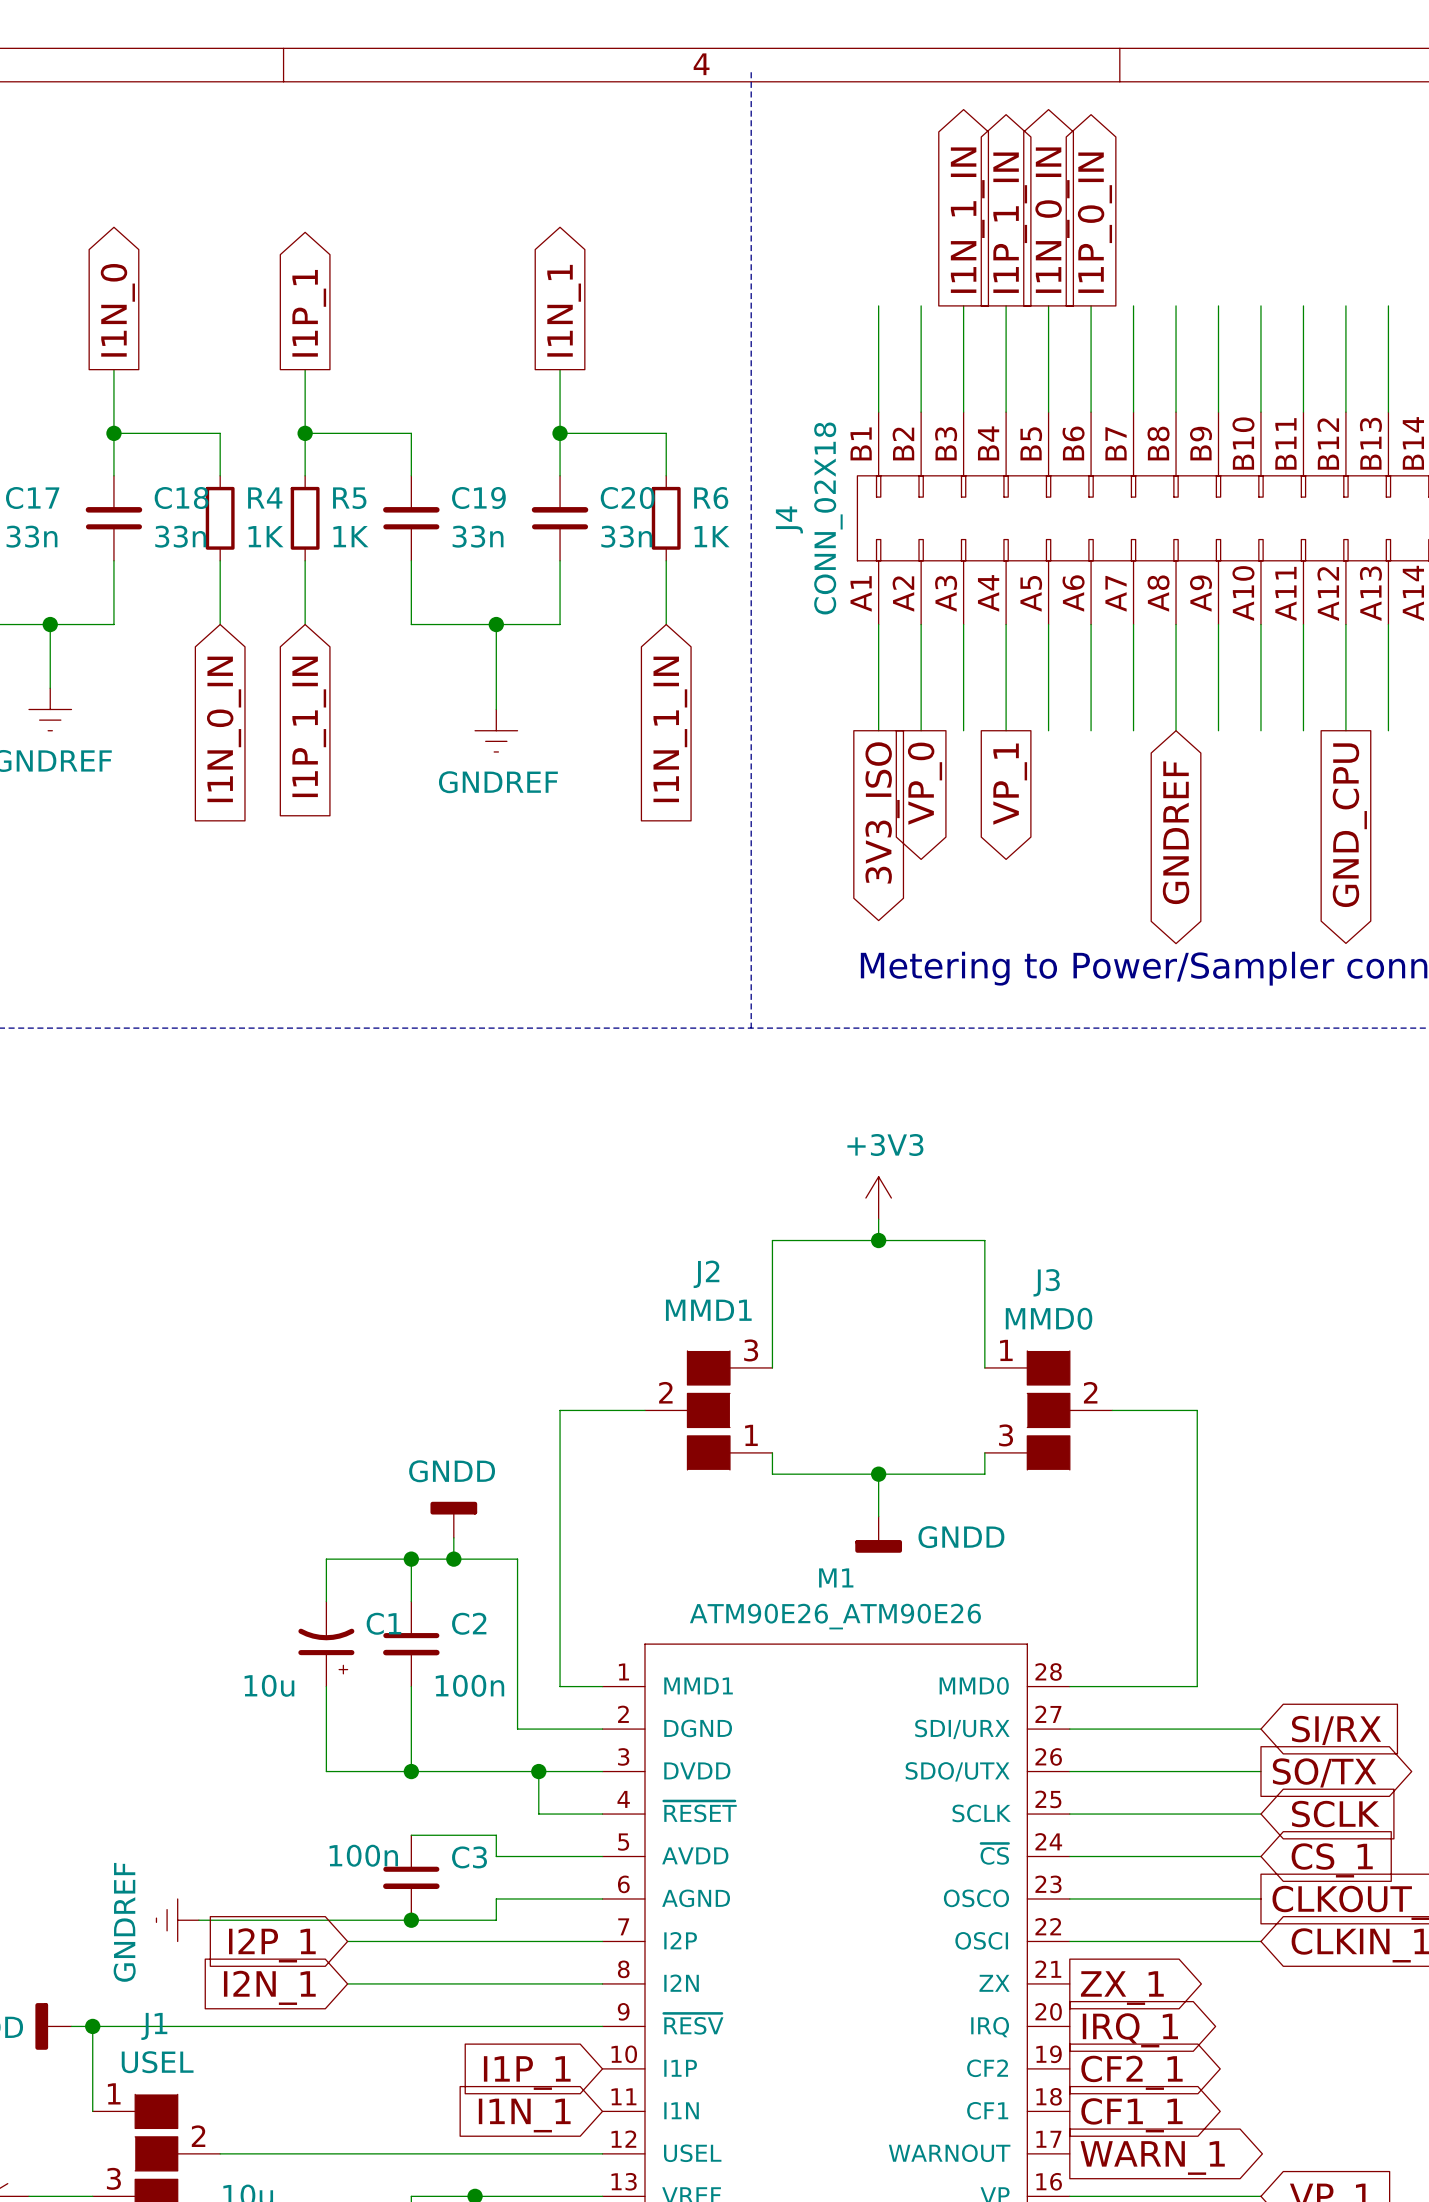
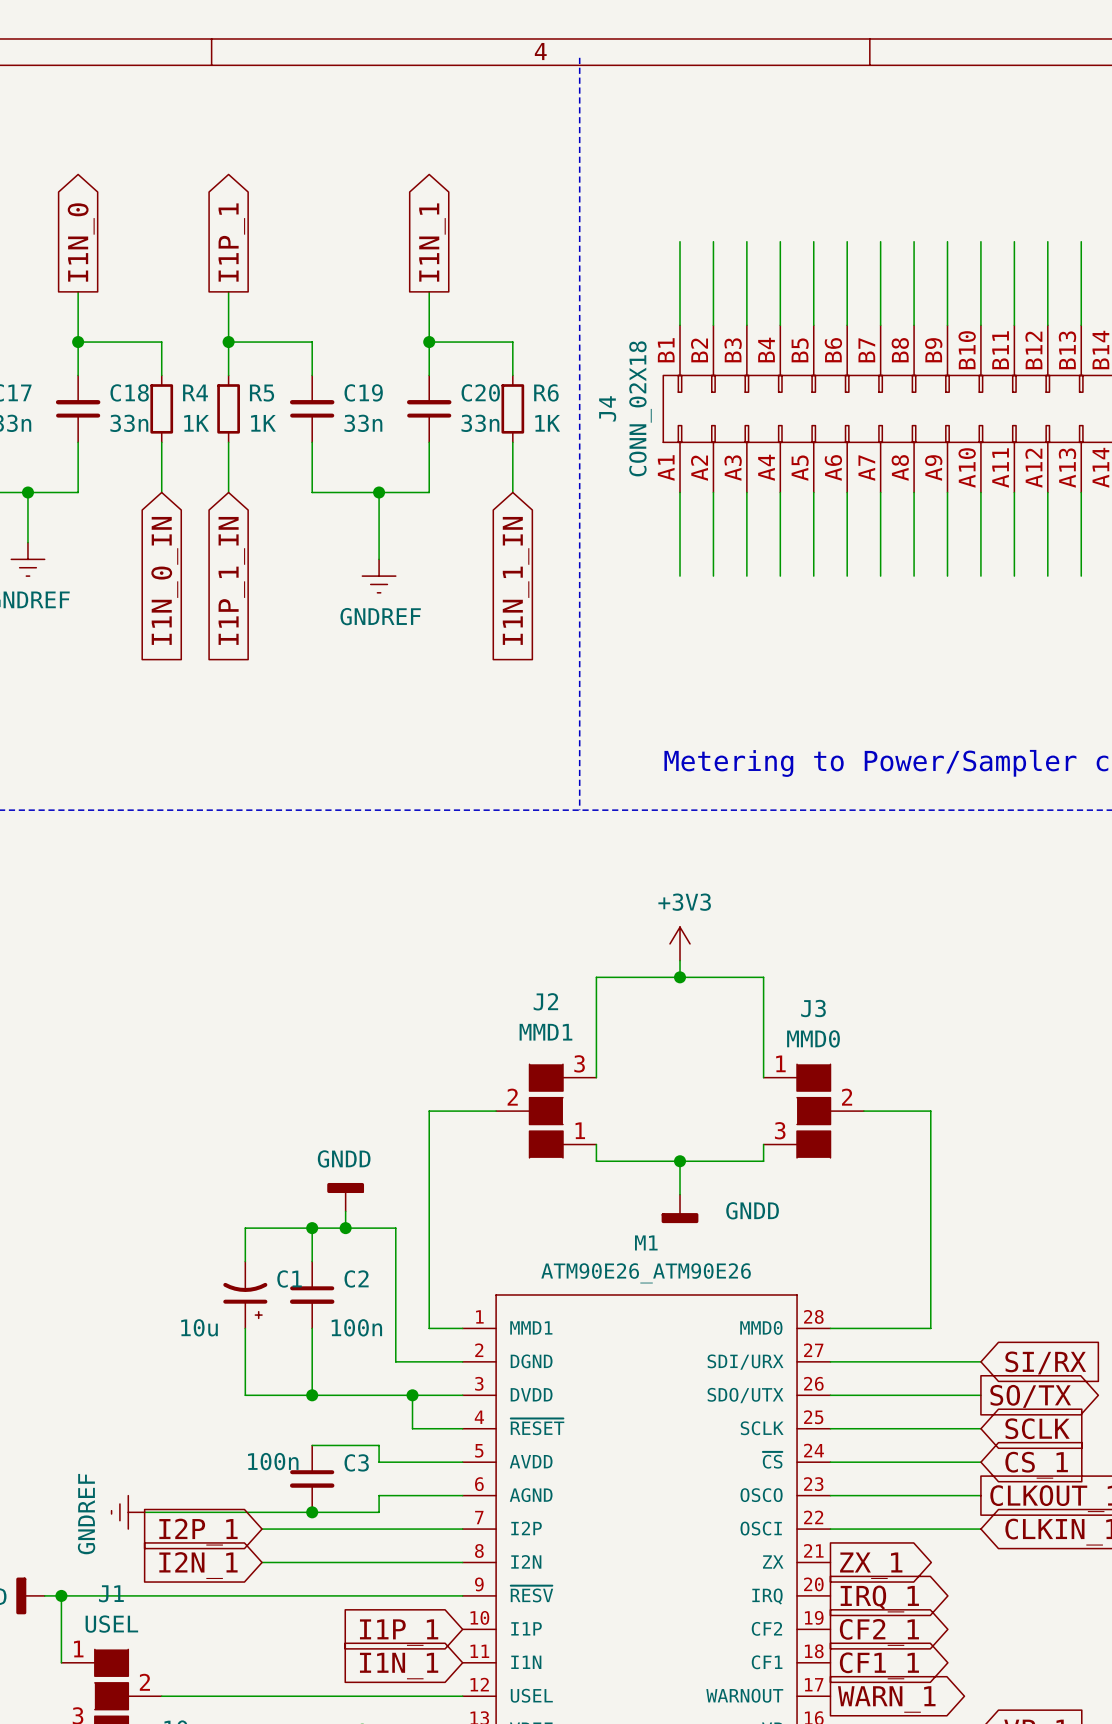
global label: I1N_1_IN (967, 220) -> none
global label: I1N_0_IN (1052, 220) -> none
global label: I1P_1_IN (1010, 222) -> none
global label: I1P_0_IN (1094, 222) -> none
global label: VP_0 (925, 783) -> none
global label: VP_1 (1010, 784) -> none
global label: 3V3_ISO (882, 812) -> none
global label: GND_CPU (1349, 825) -> none
global label: GNDREF (1176, 832) -> none

